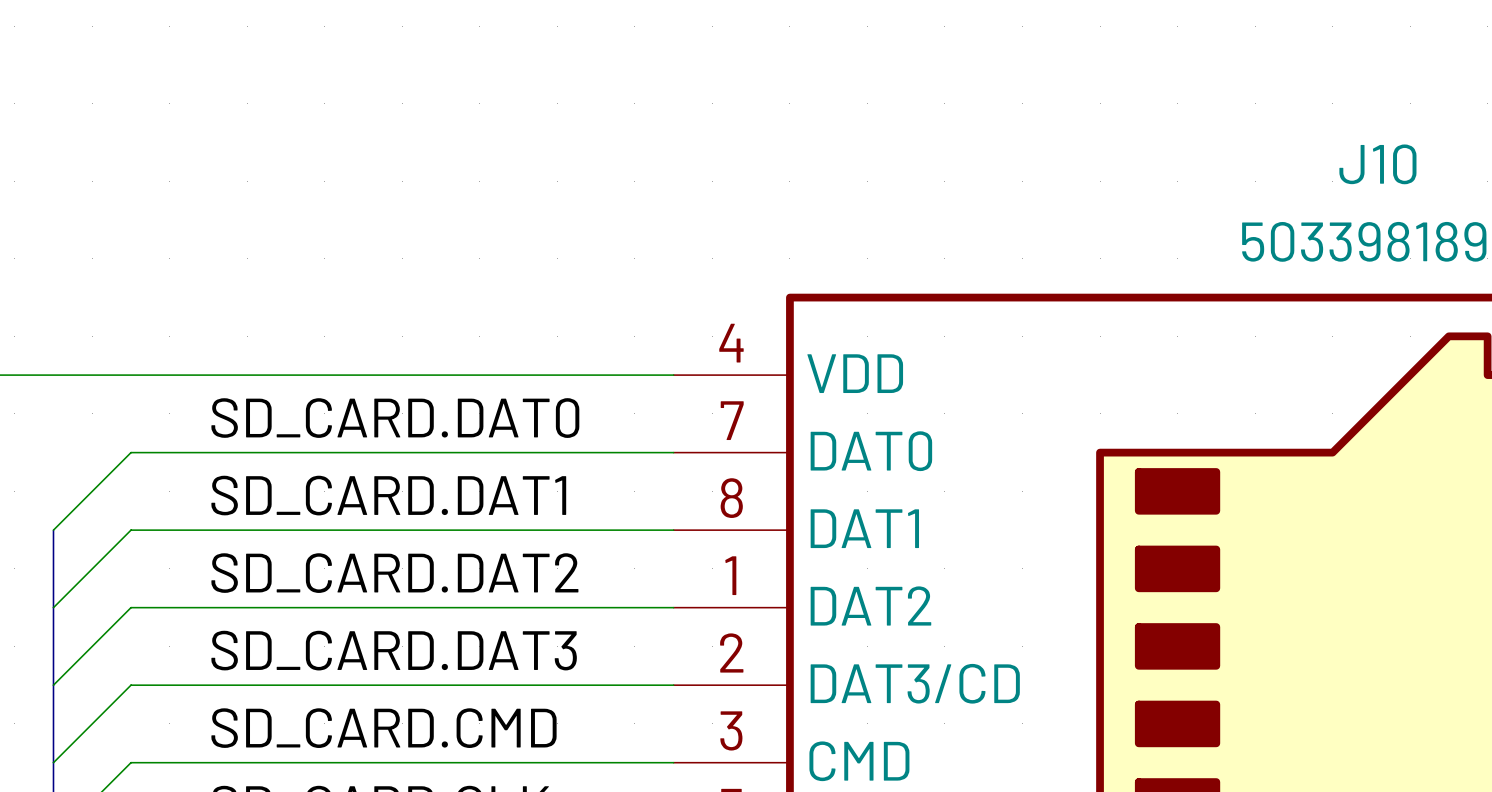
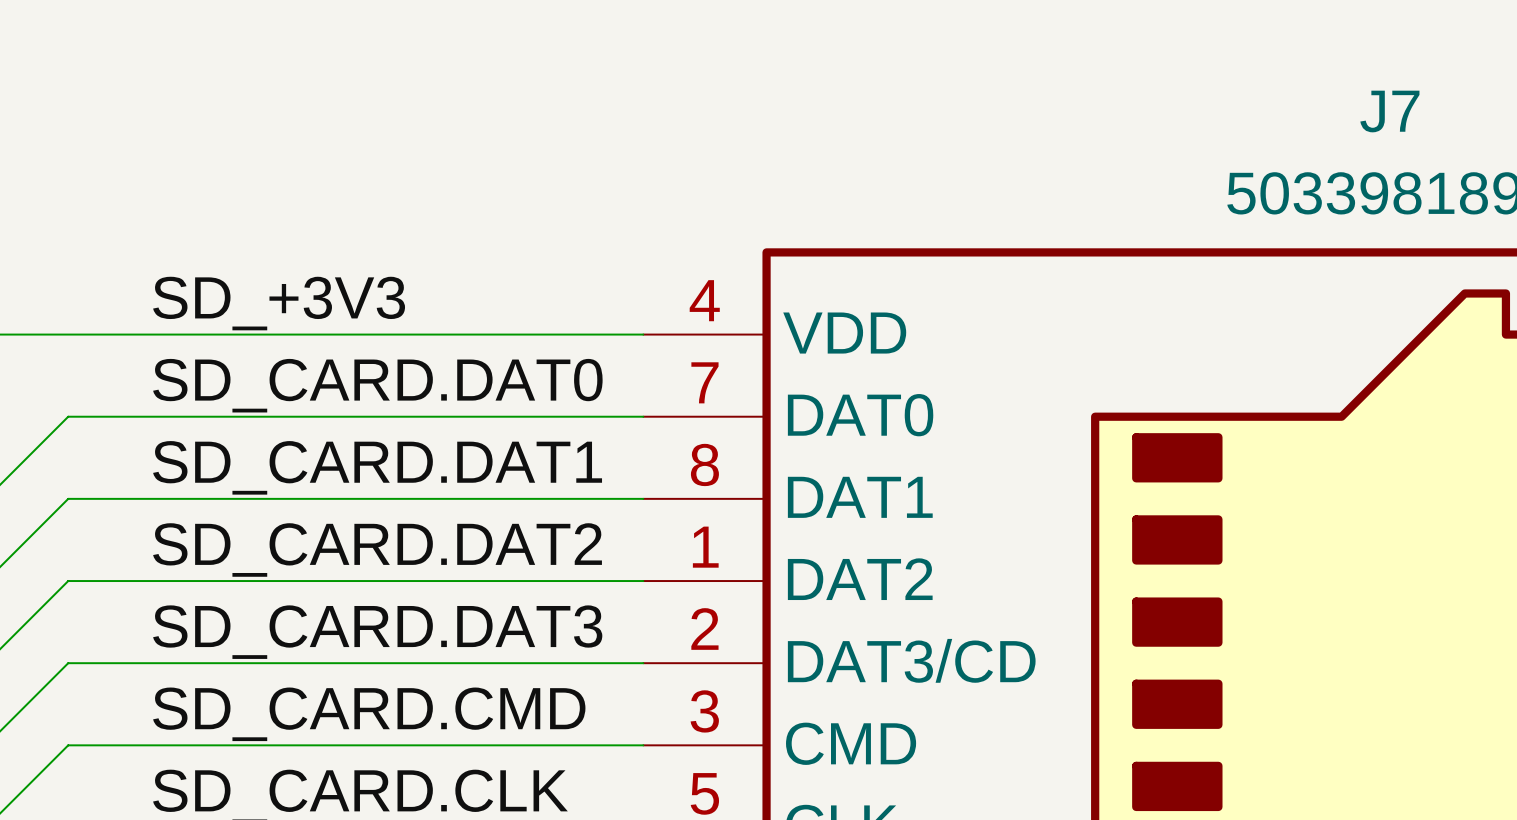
J10 name: J10 (1377, 164) -> J7 (1389, 111)
label: none -> SD_+3V3 (279, 303)

